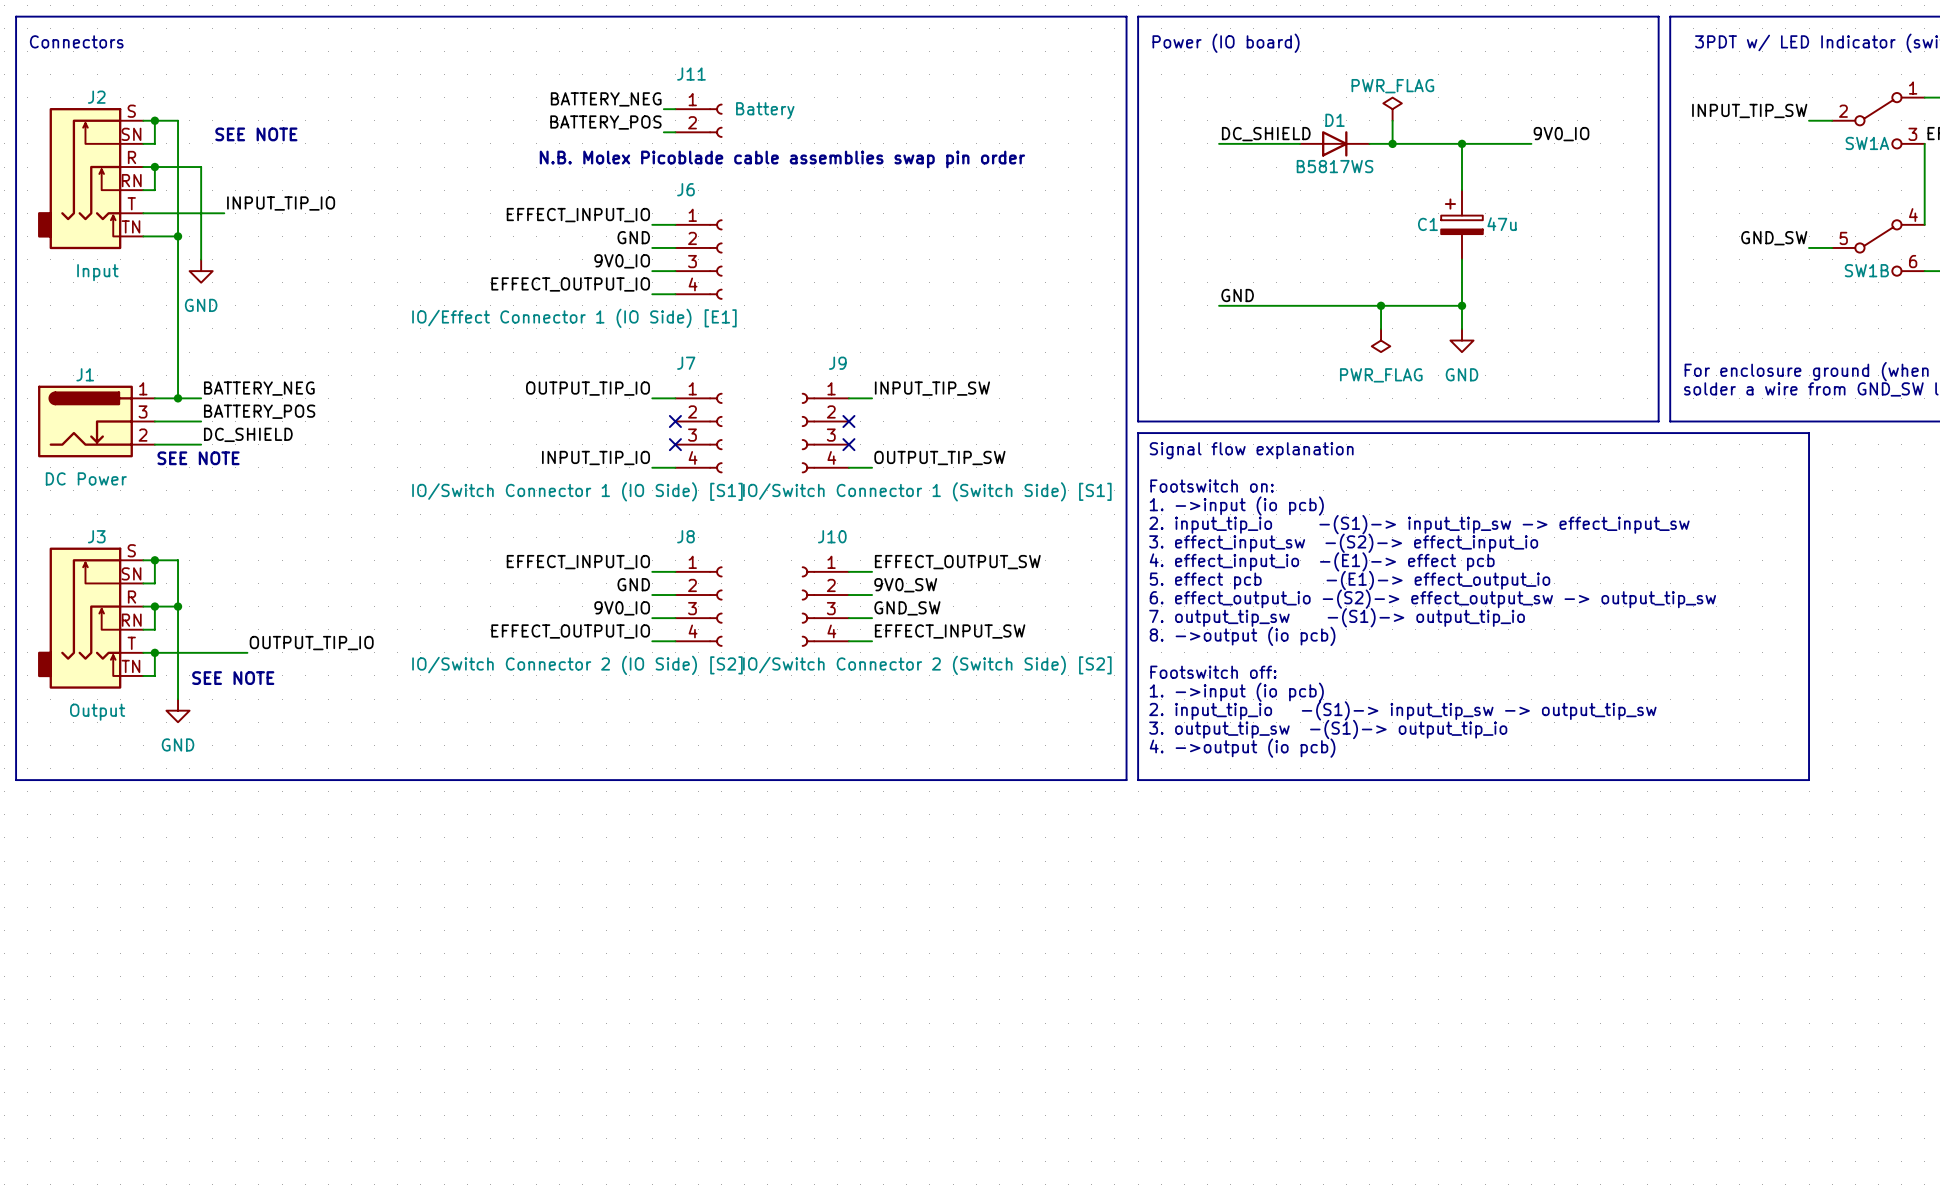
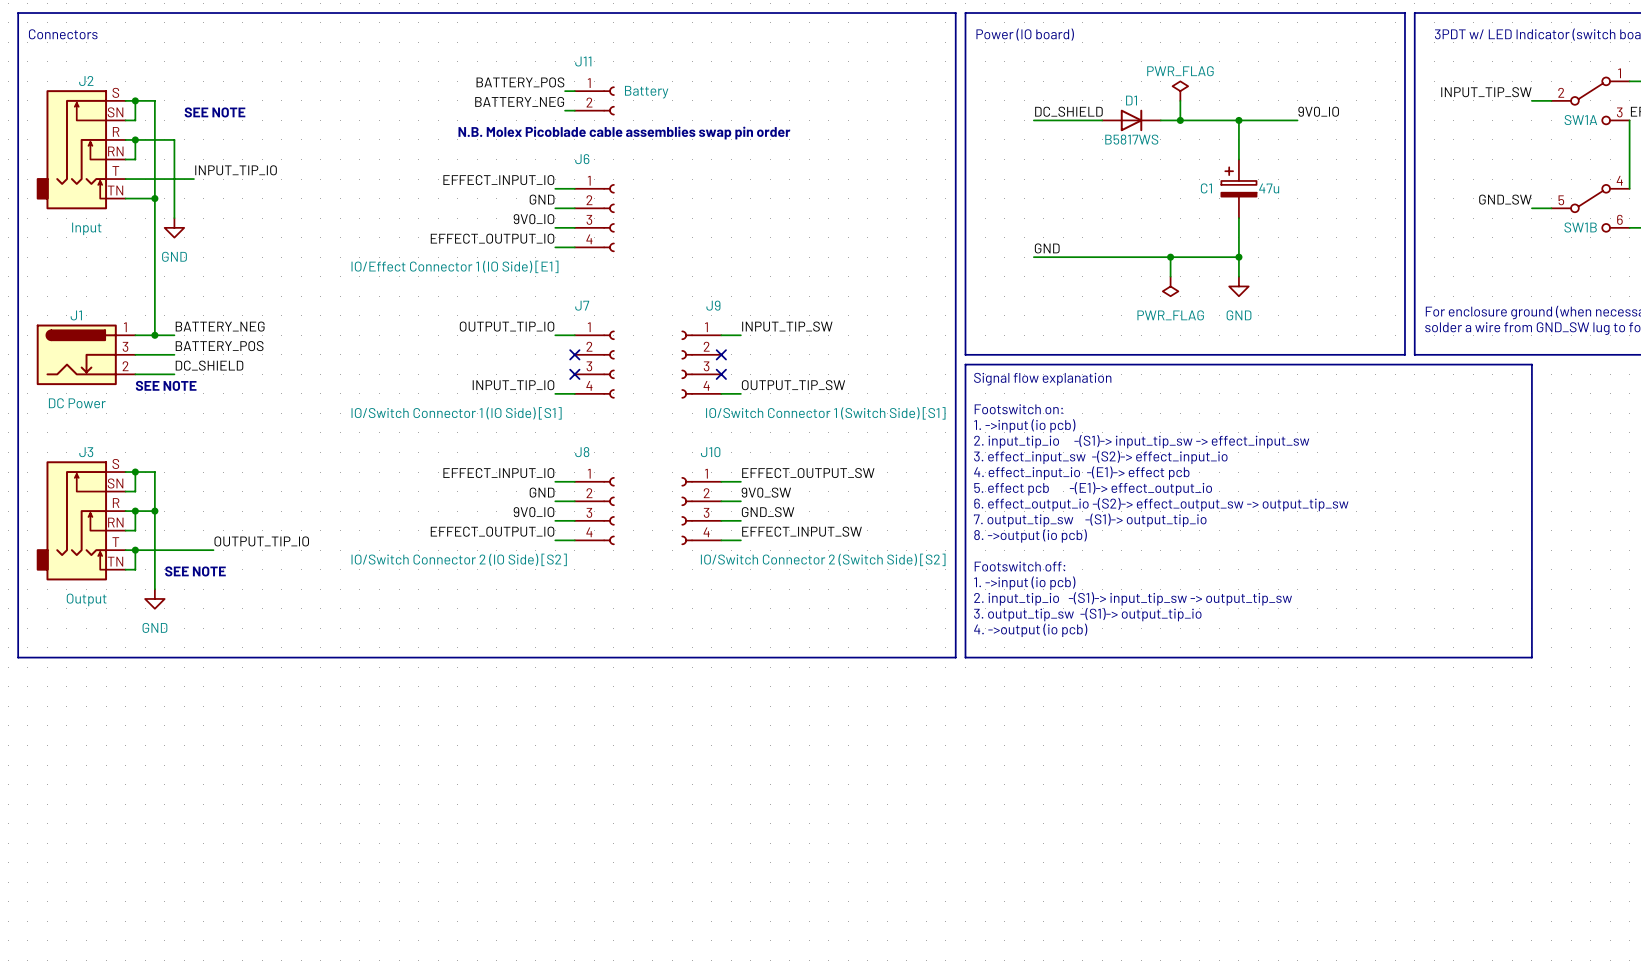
label: BATTERY_NEG (606, 99) -> BATTERY_POS (520, 82)
label: BATTERY_POS (605, 122) -> BATTERY_NEG (519, 101)

